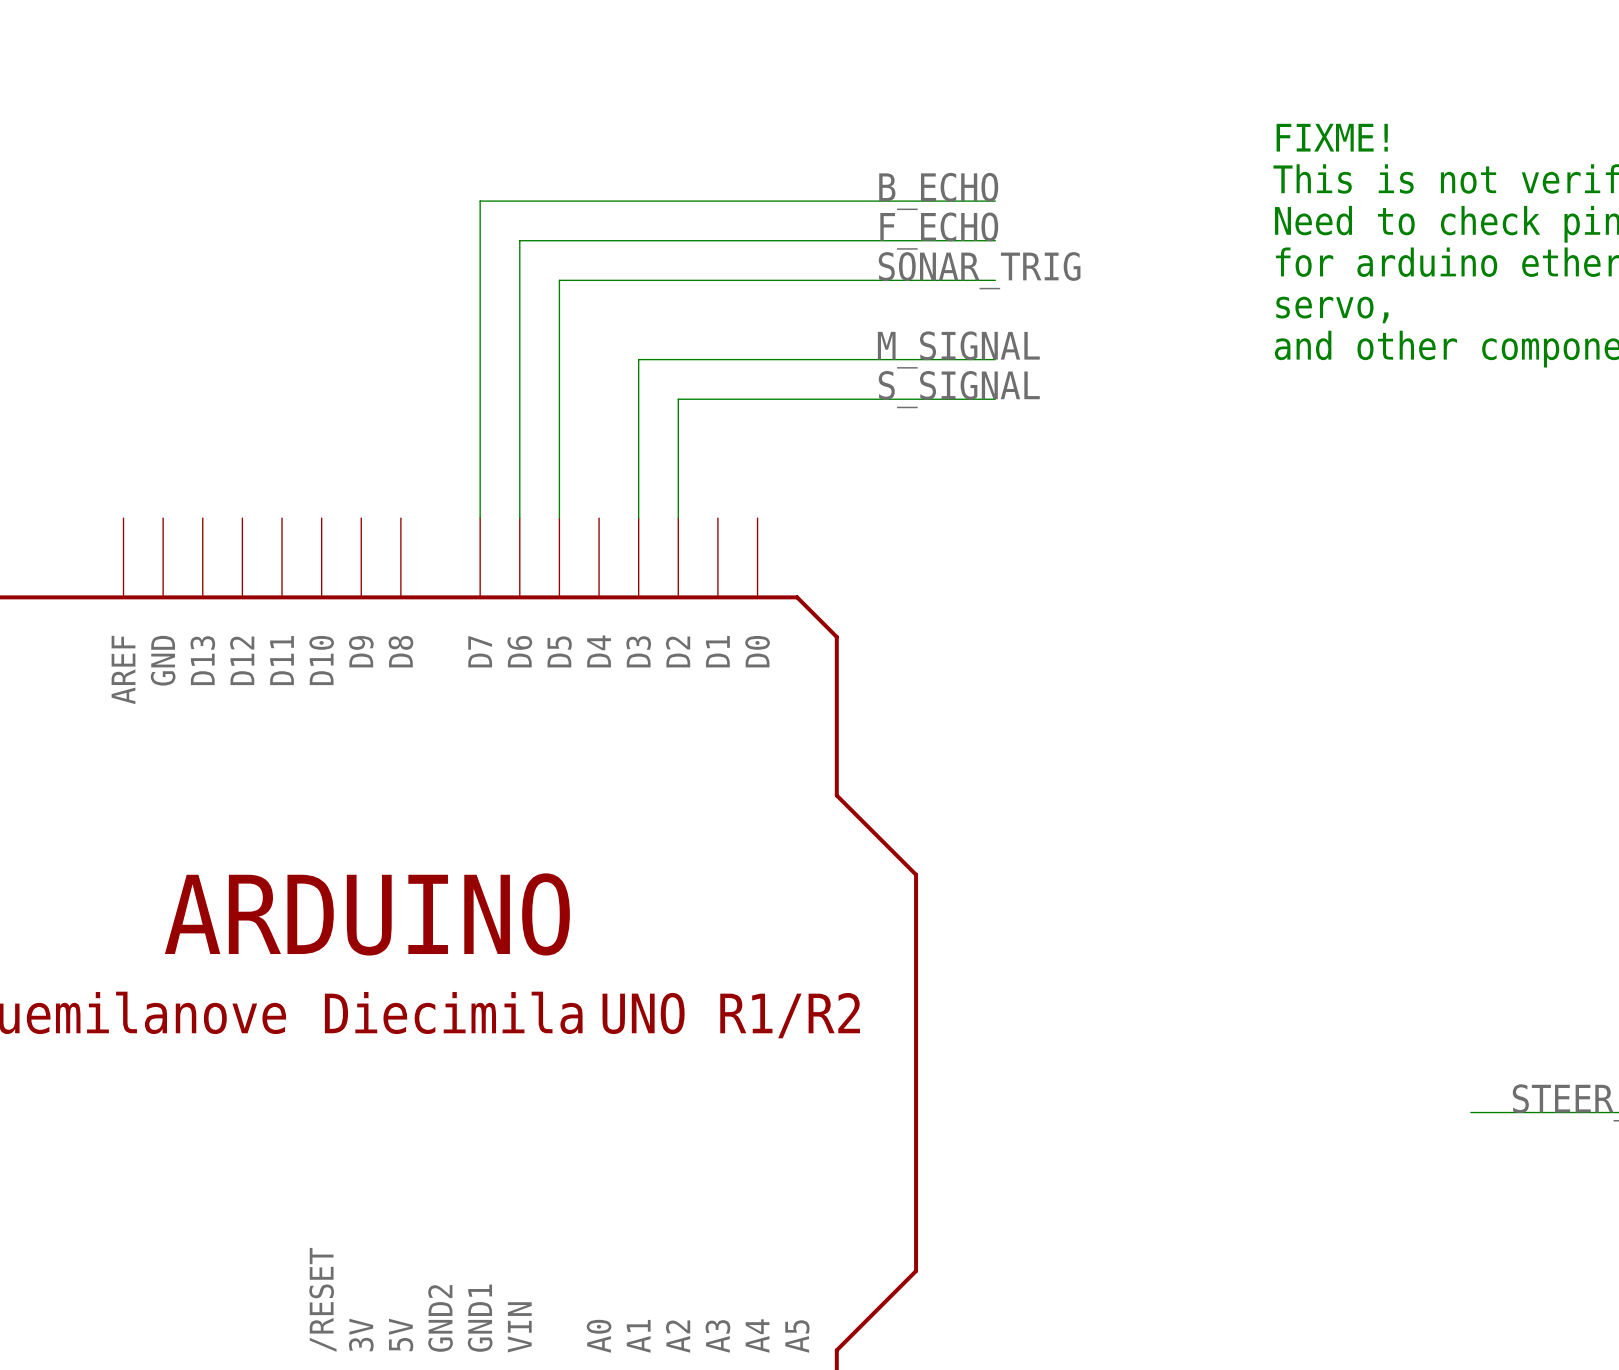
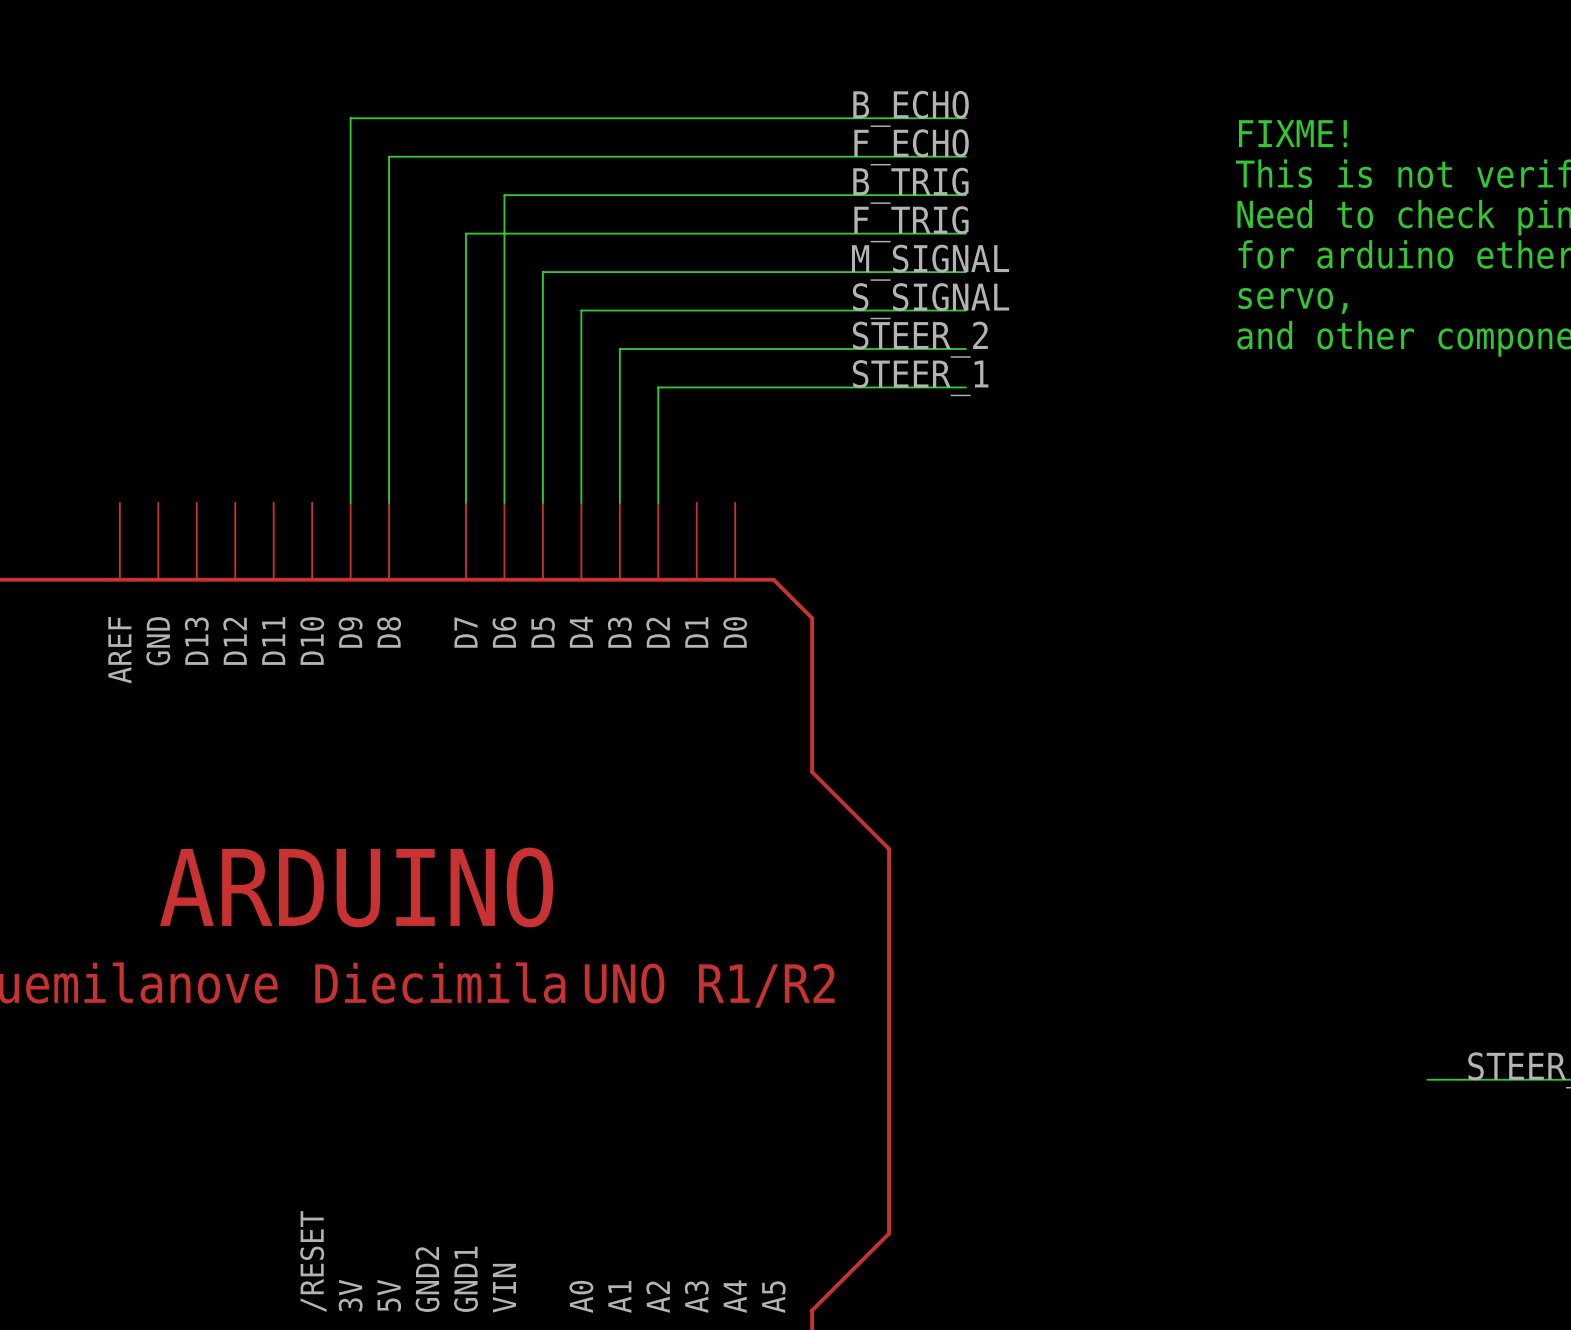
label: none -> B_ECHO (911, 108)
wire: none -> (965, 118) (350, 118) (350, 502)
label: none -> F_ECHO (911, 147)
wire: none -> (965, 156) (389, 156) (389, 502)
label: B_ECHO (938, 191) -> B_TRIG (910, 185)
wire: (519, 201) (480, 201) (480, 240) -> (504, 195) (504, 233) (466, 233)
label: F_ECHO (939, 231) -> F_TRIG (911, 224)
label: SONAR_TRIG (979, 270) -> M_SIGNAL (930, 262)
label: none -> S_SIGNAL (930, 301)
wire: none -> (965, 310) (581, 310) (581, 502)
label: M_SIGNAL (958, 349) -> STEER_2 (920, 339)
label: S_SIGNAL (959, 389) -> STEER_1 (920, 378)

